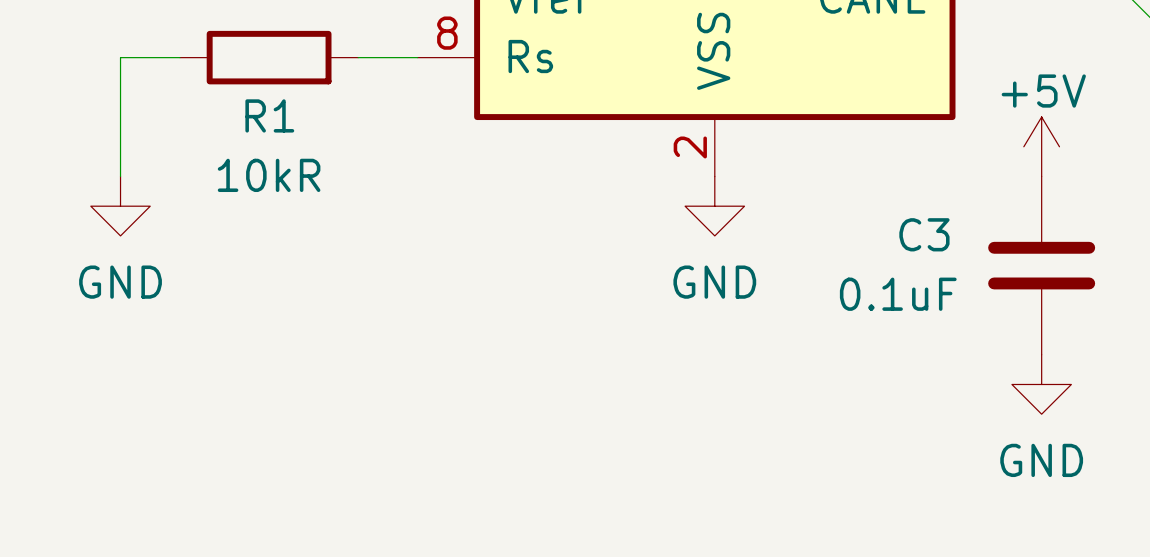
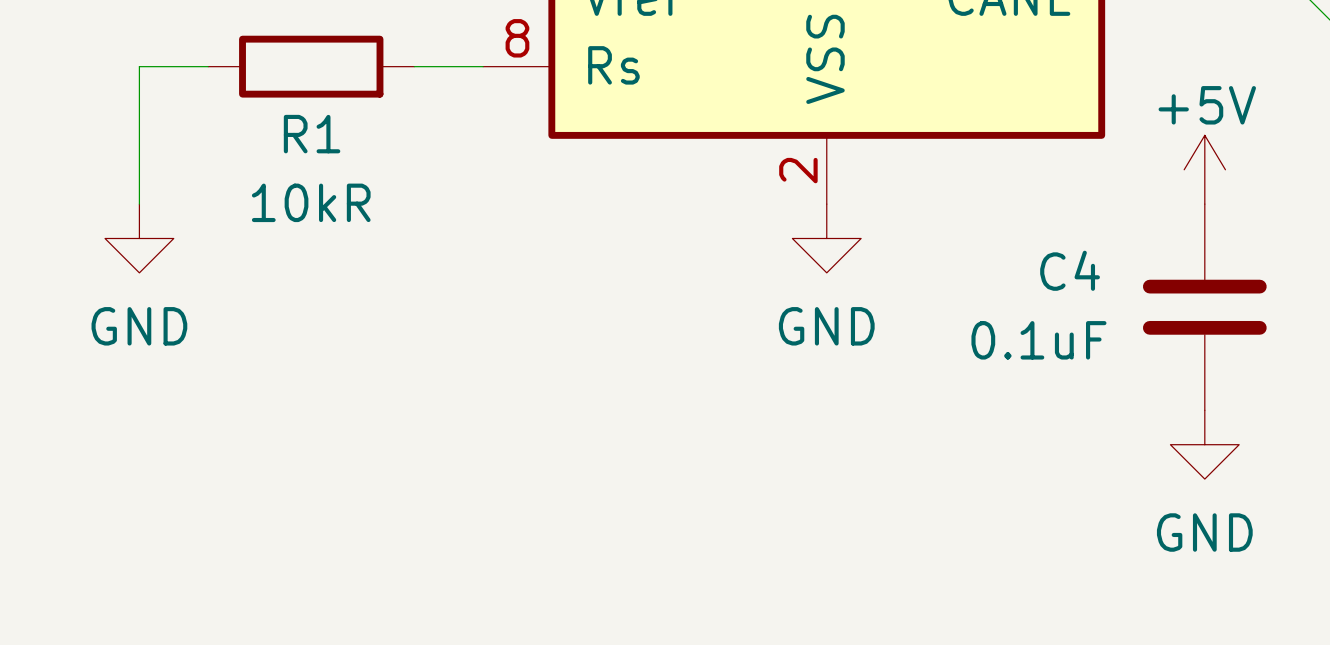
C3 name: C3 (924, 234) -> C4 (1070, 270)

